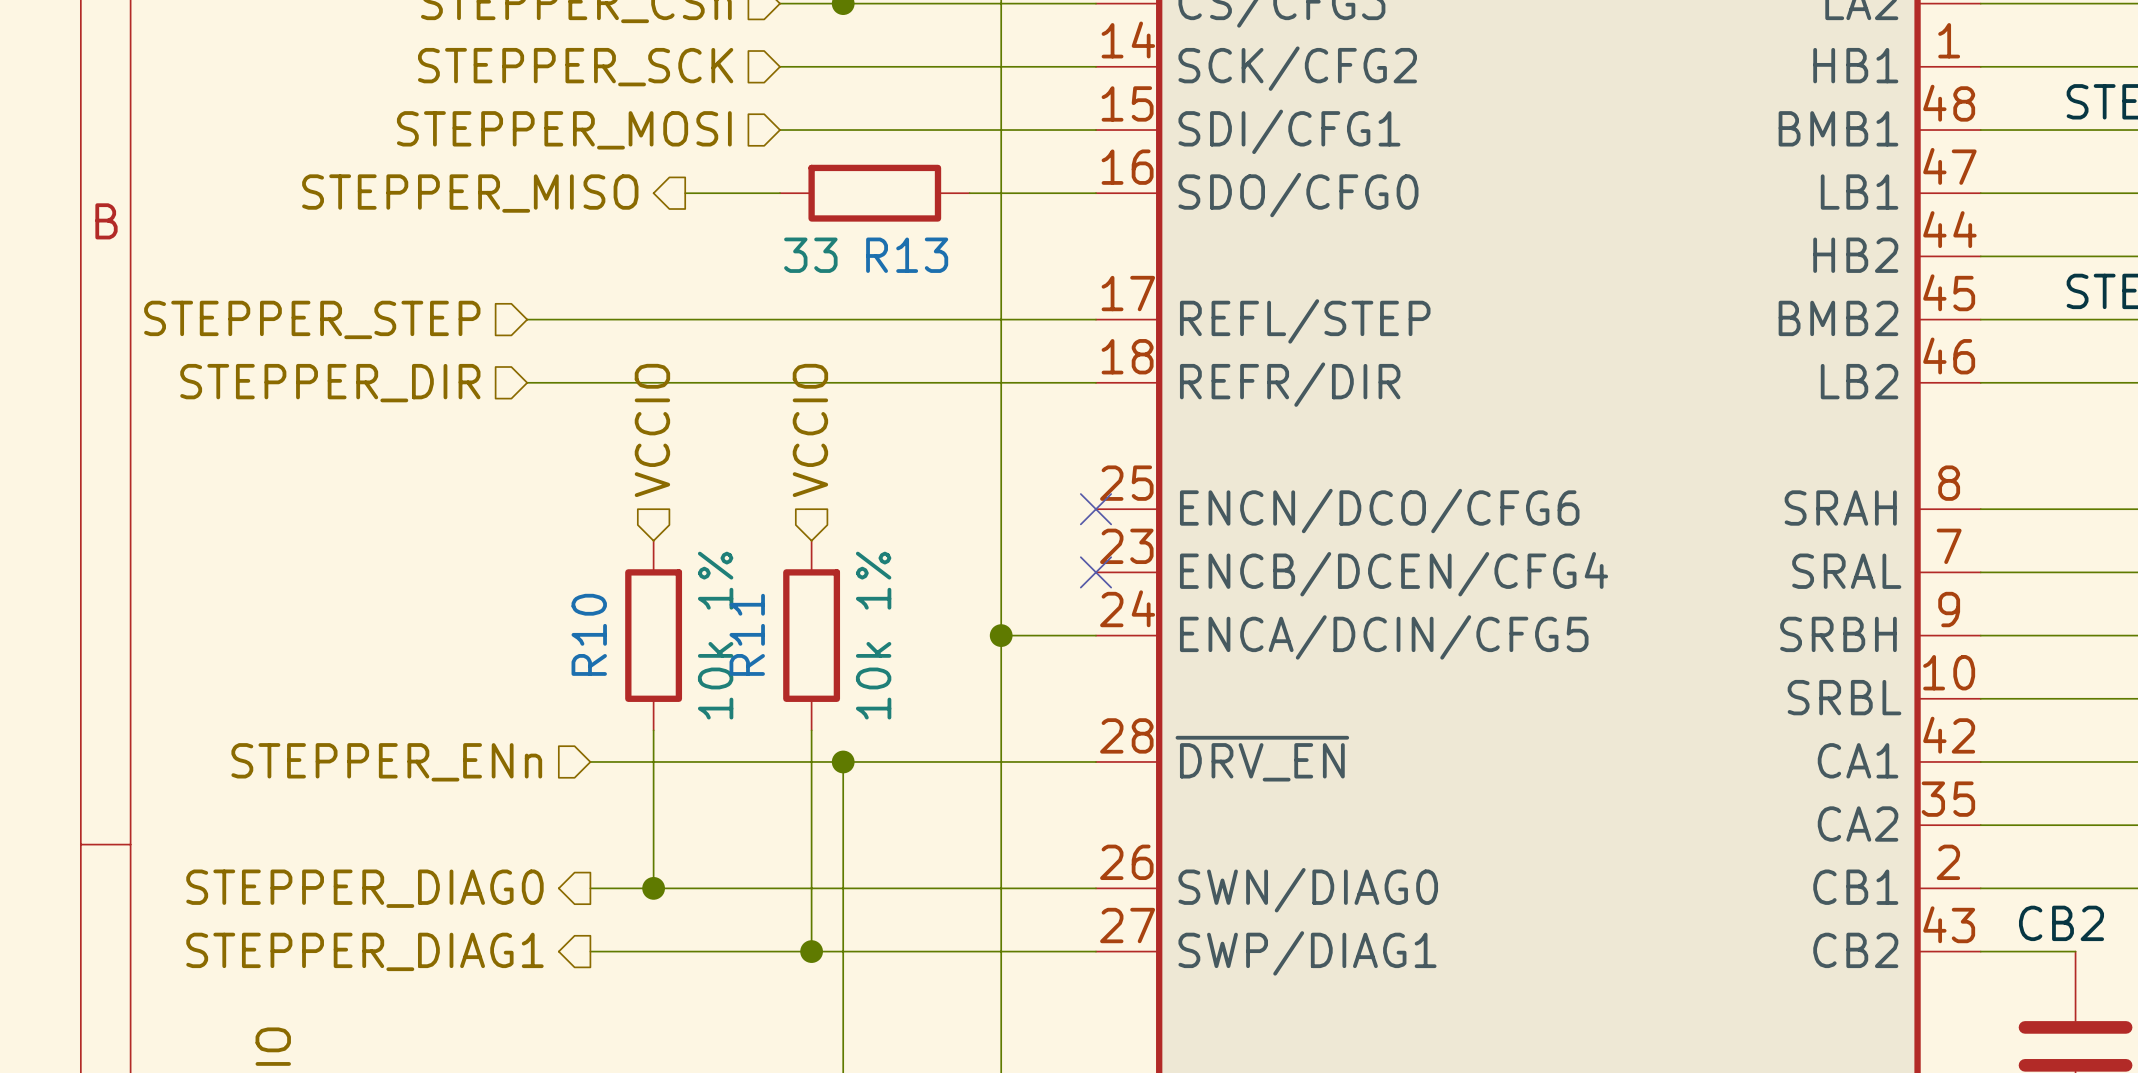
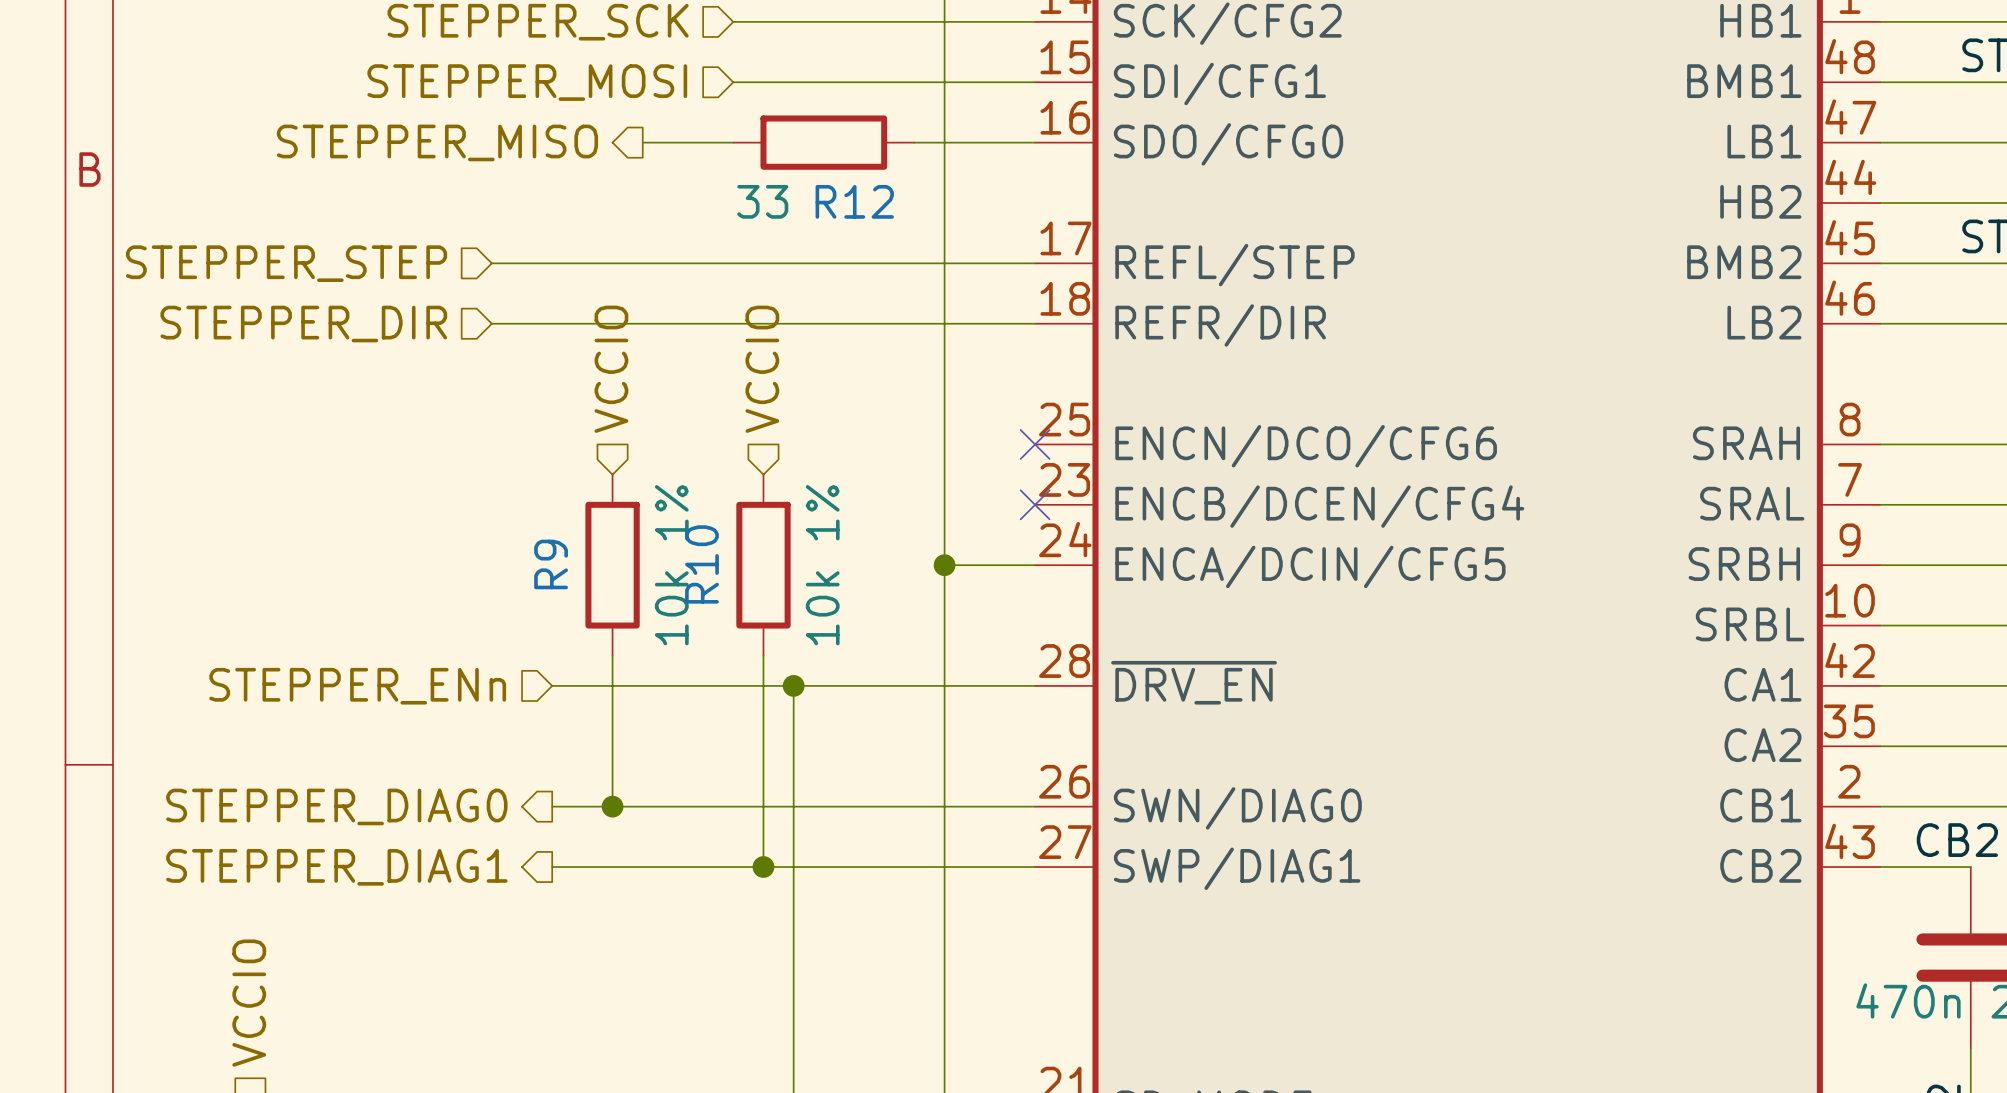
R13 name: R13 (907, 255) -> R12 (854, 201)
R10 name: R10 (589, 634) -> R9 (551, 564)
R11 name: R11 (747, 634) -> R10 (701, 564)

